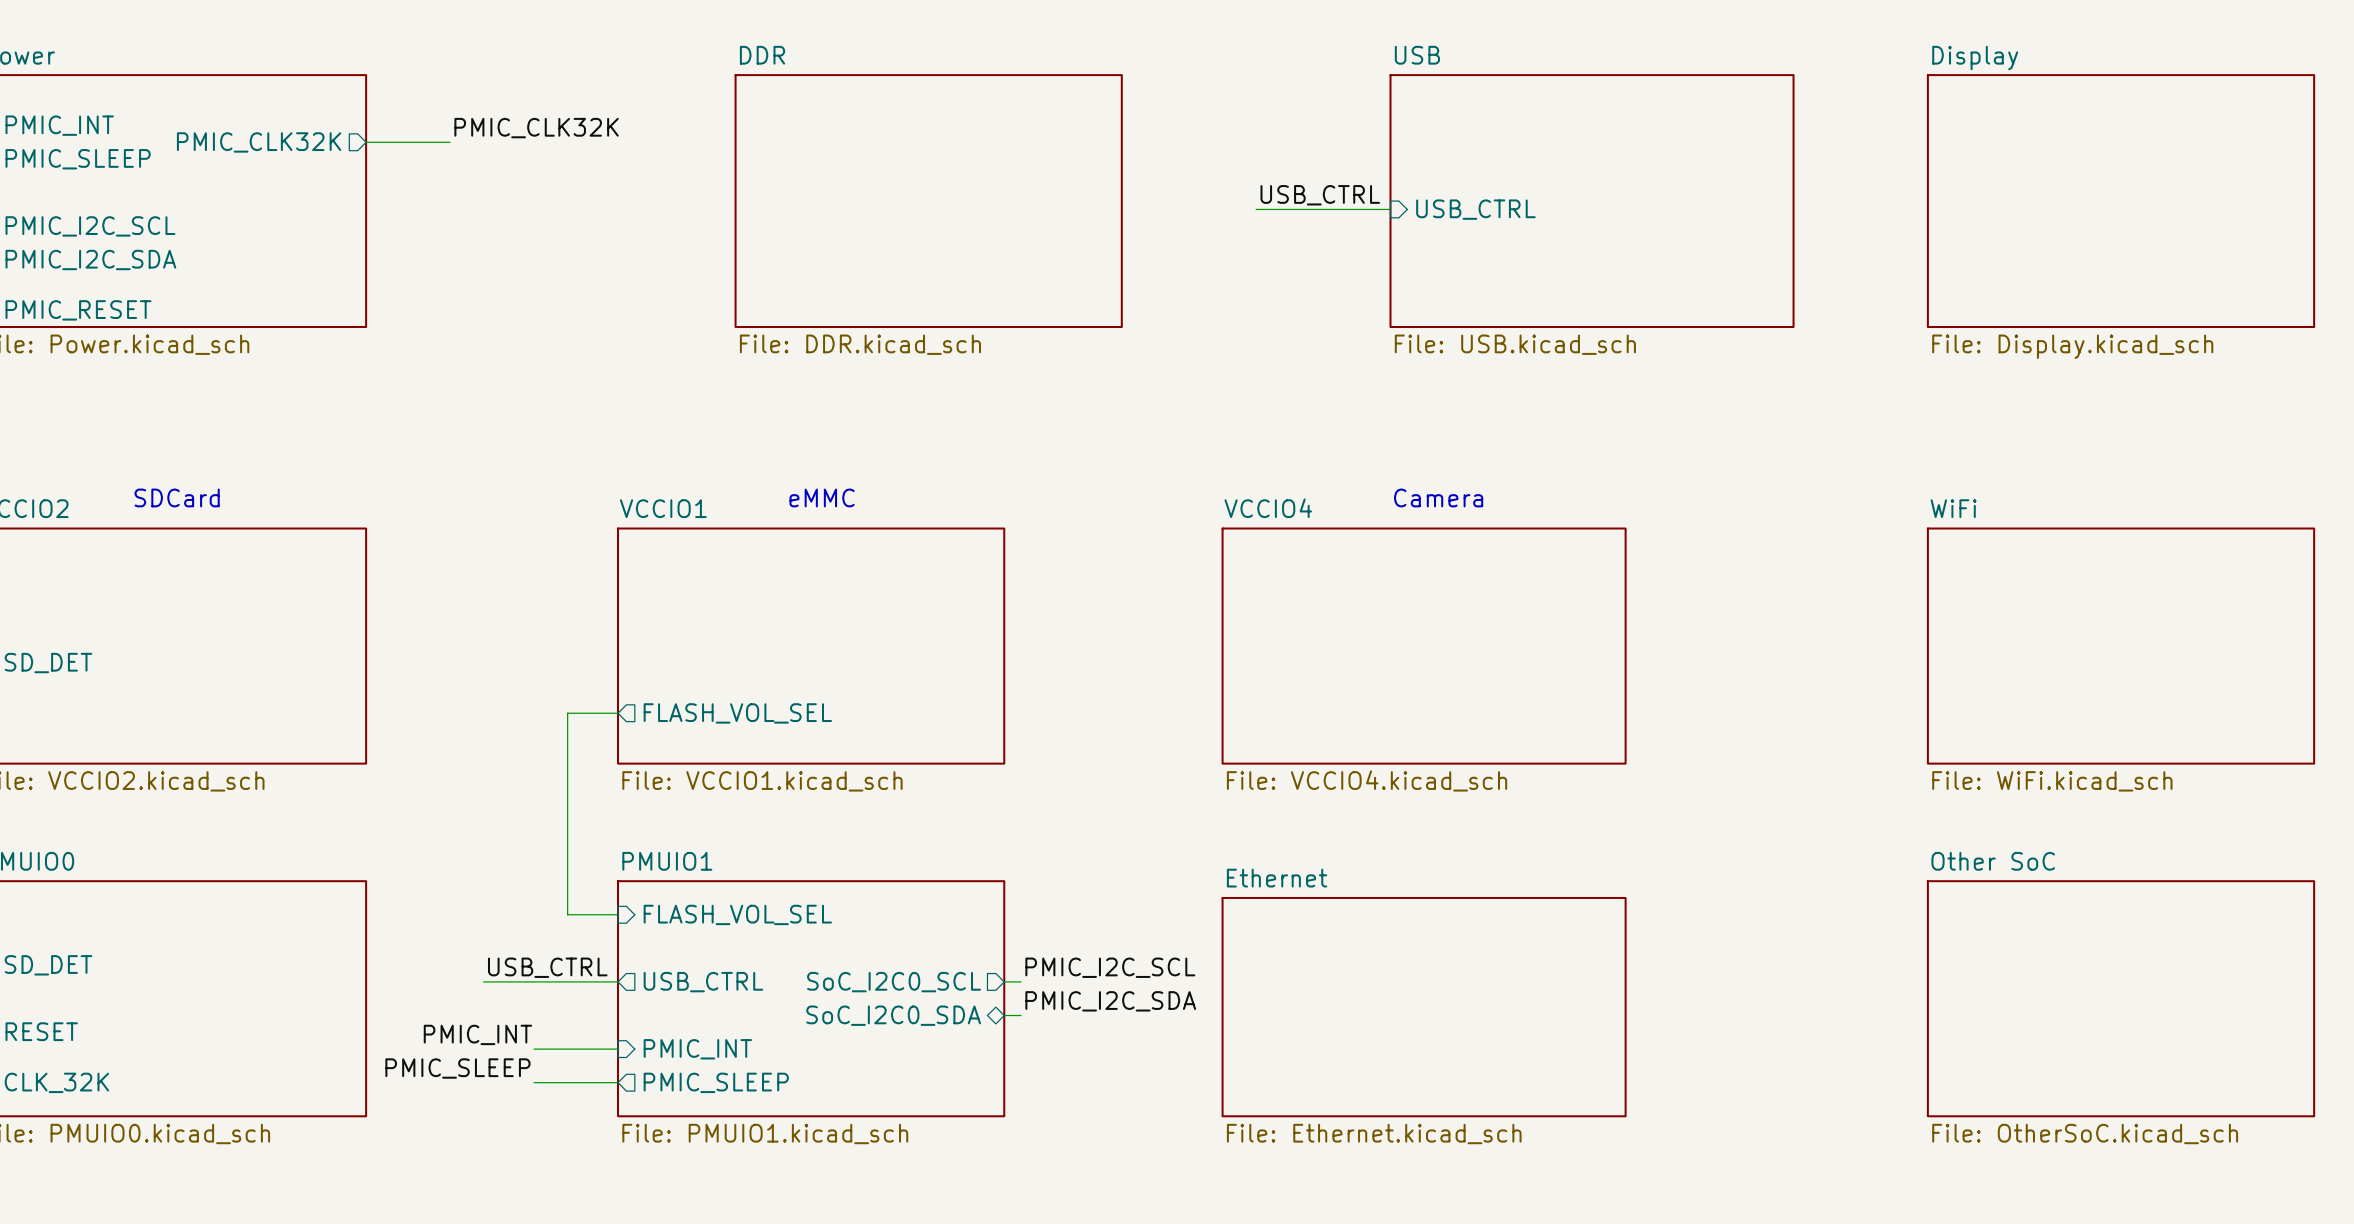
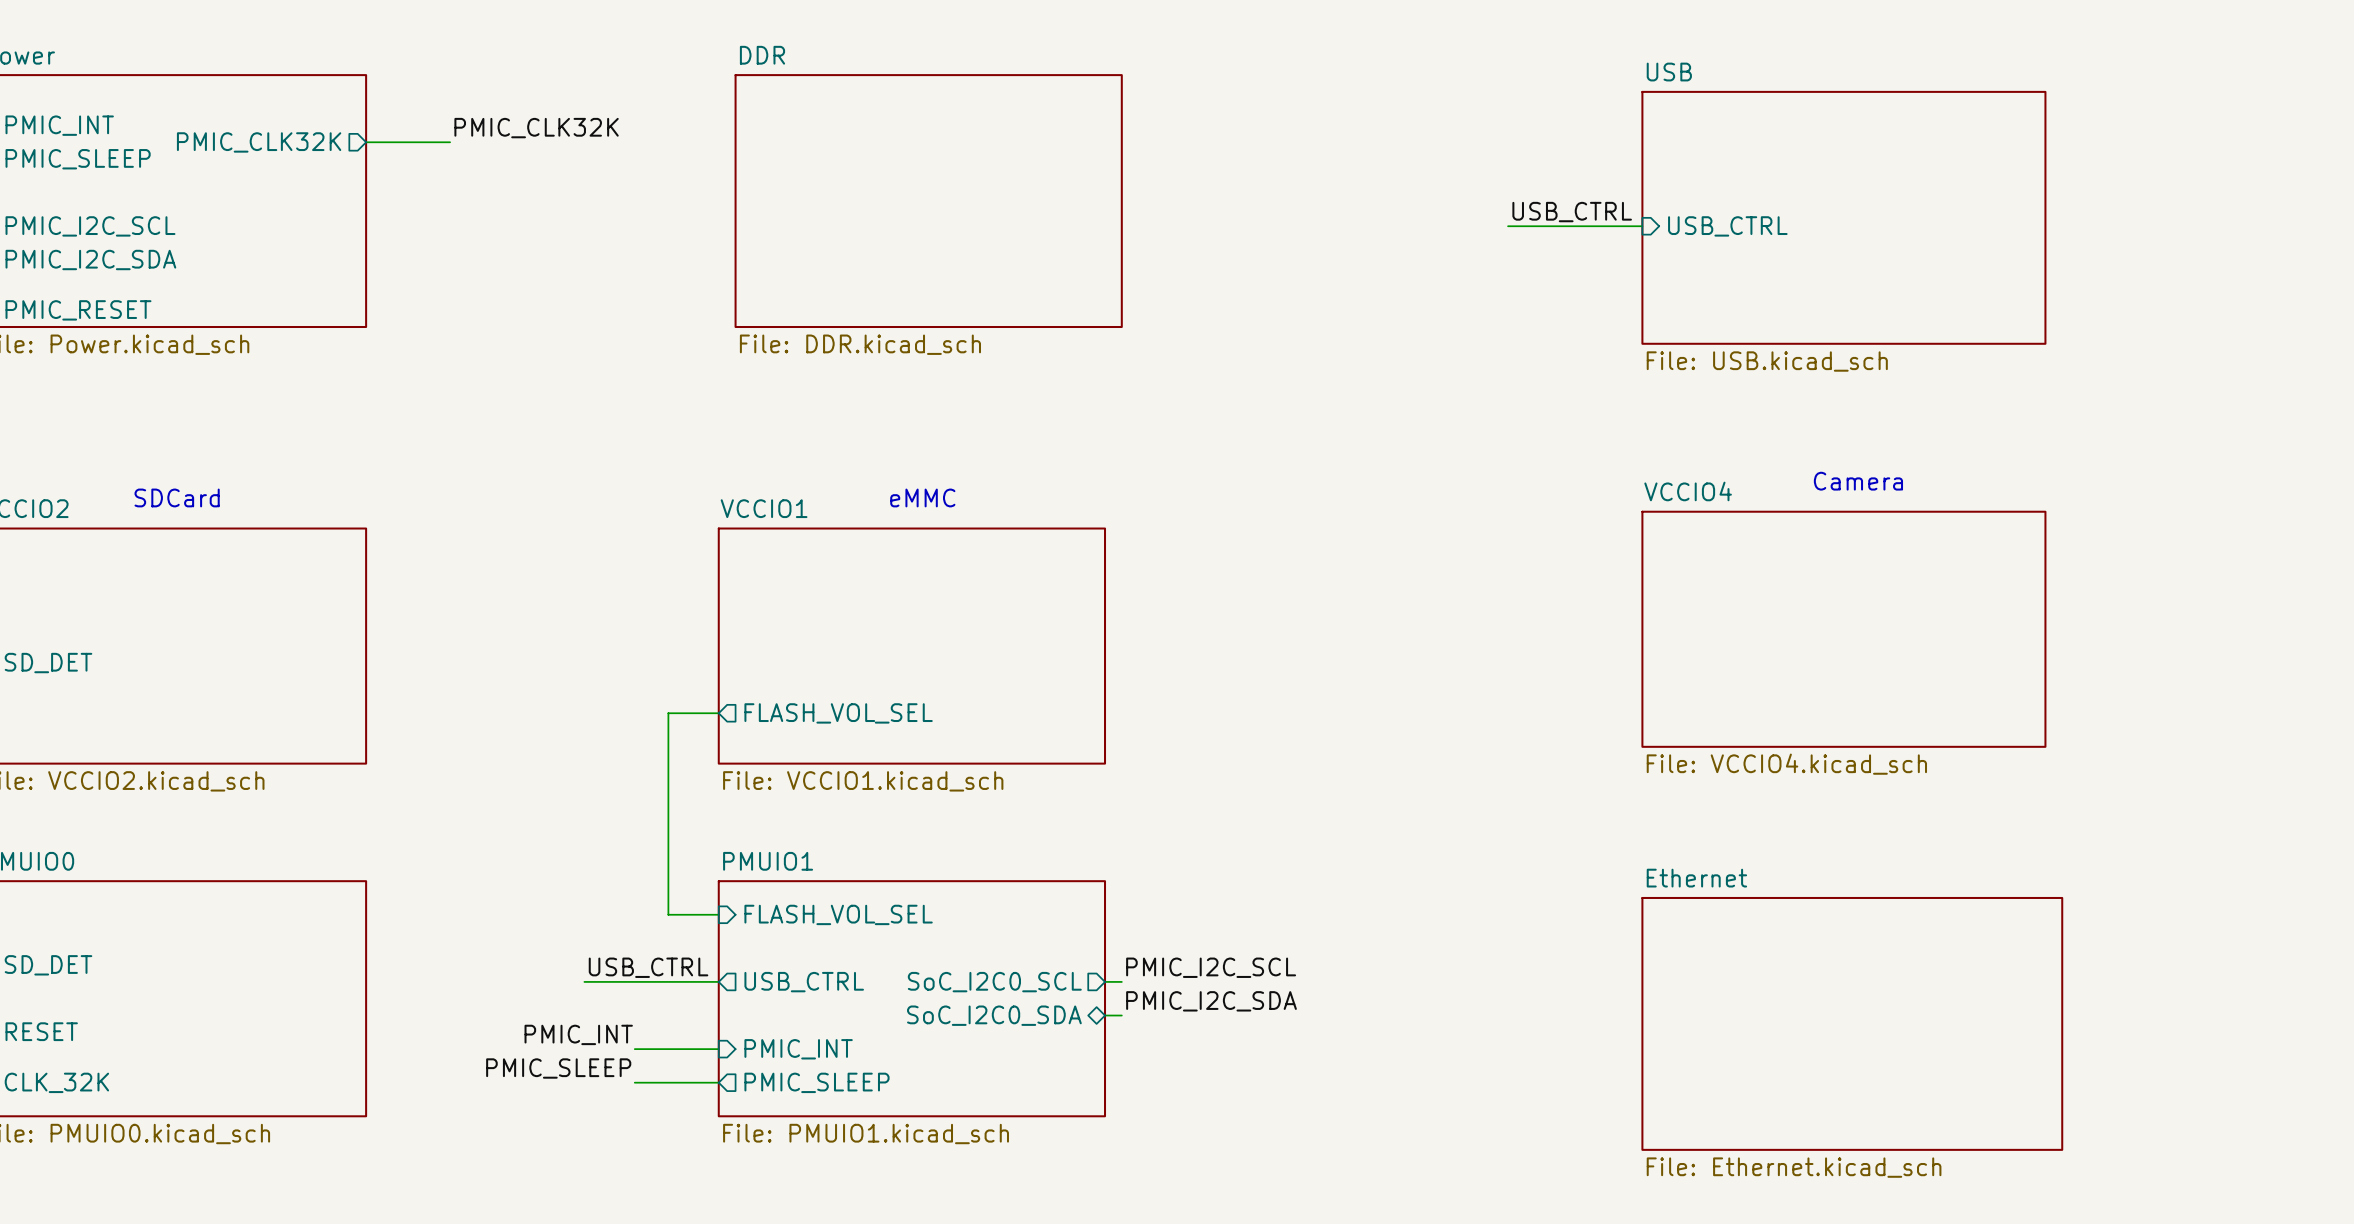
label position: USB_CTRL (1320, 195) -> USB_CTRL (1572, 212)
sheet USB position: (1592, 201) -> (1843, 217)
sheet Display: File: Display.kicad_sch (2121, 201) -> none
wire: (1256, 209) (1390, 209) -> (1508, 226) (1642, 226)
sheet pin position: USB_CTRL (1475, 209) -> USB_CTRL (1727, 226)
text: none -> Camera (1858, 481)
text position: eMMC (822, 497) -> eMMC (922, 497)
text: Camera (1438, 497) -> none
sheet VCCIO1 position: (811, 646) -> (911, 646)
sheet VCCIO4 position: (1424, 646) -> (1843, 629)
sheet WiFi: File: WiFi.kicad_sch (2121, 646) -> none
wire: (618, 713) (567, 713) (567, 914) (618, 914) -> (718, 713) (668, 713) (668, 914) (718, 914)
sheet pin position: FLASH_VOL_SEL (737, 713) -> FLASH_VOL_SEL (838, 713)
sheet pin position: FLASH_VOL_SEL (737, 914) -> FLASH_VOL_SEL (838, 914)
label position: USB_CTRL (547, 967) -> USB_CTRL (648, 967)
label position: PMIC_I2C_SCL (1110, 967) -> PMIC_I2C_SCL (1211, 967)
wire: (483, 981) (584, 981) -> (618, 981) (718, 981)
wire: (1004, 981) (1021, 981) -> (1105, 981) (1121, 981)
sheet pin position: USB_CTRL (703, 982) -> USB_CTRL (804, 982)
sheet pin position: SoC_I2C0_SCL (894, 982) -> SoC_I2C0_SCL (994, 982)
sheet PMUIO1 position: (811, 998) -> (911, 998)
sheet Other SoC: File: OtherSoC.kicad_sch (2121, 998) -> none
label position: PMIC_I2C_SDA (1110, 1001) -> PMIC_I2C_SDA (1211, 1001)
sheet Ethernet: File: Ethernet.kicad_sch (1424, 1007) -> none
sheet pin position: SoC_I2C0_SDA (893, 1015) -> SoC_I2C0_SDA (994, 1015)
wire: (1004, 1015) (1021, 1015) -> (1105, 1015) (1121, 1015)
sheet Ethernet: none -> File: Ethernet.kicad_sch (1852, 1023)
label position: PMIC_INT (477, 1034) -> PMIC_INT (578, 1034)
wire: (534, 1049) (618, 1049) -> (634, 1049) (718, 1049)
sheet pin position: PMIC_INT (697, 1049) -> PMIC_INT (798, 1049)
label position: PMIC_SLEEP (457, 1068) -> PMIC_SLEEP (558, 1068)
wire: (534, 1082) (618, 1082) -> (634, 1082) (718, 1082)
sheet pin position: PMIC_SLEEP (716, 1082) -> PMIC_SLEEP (816, 1082)

